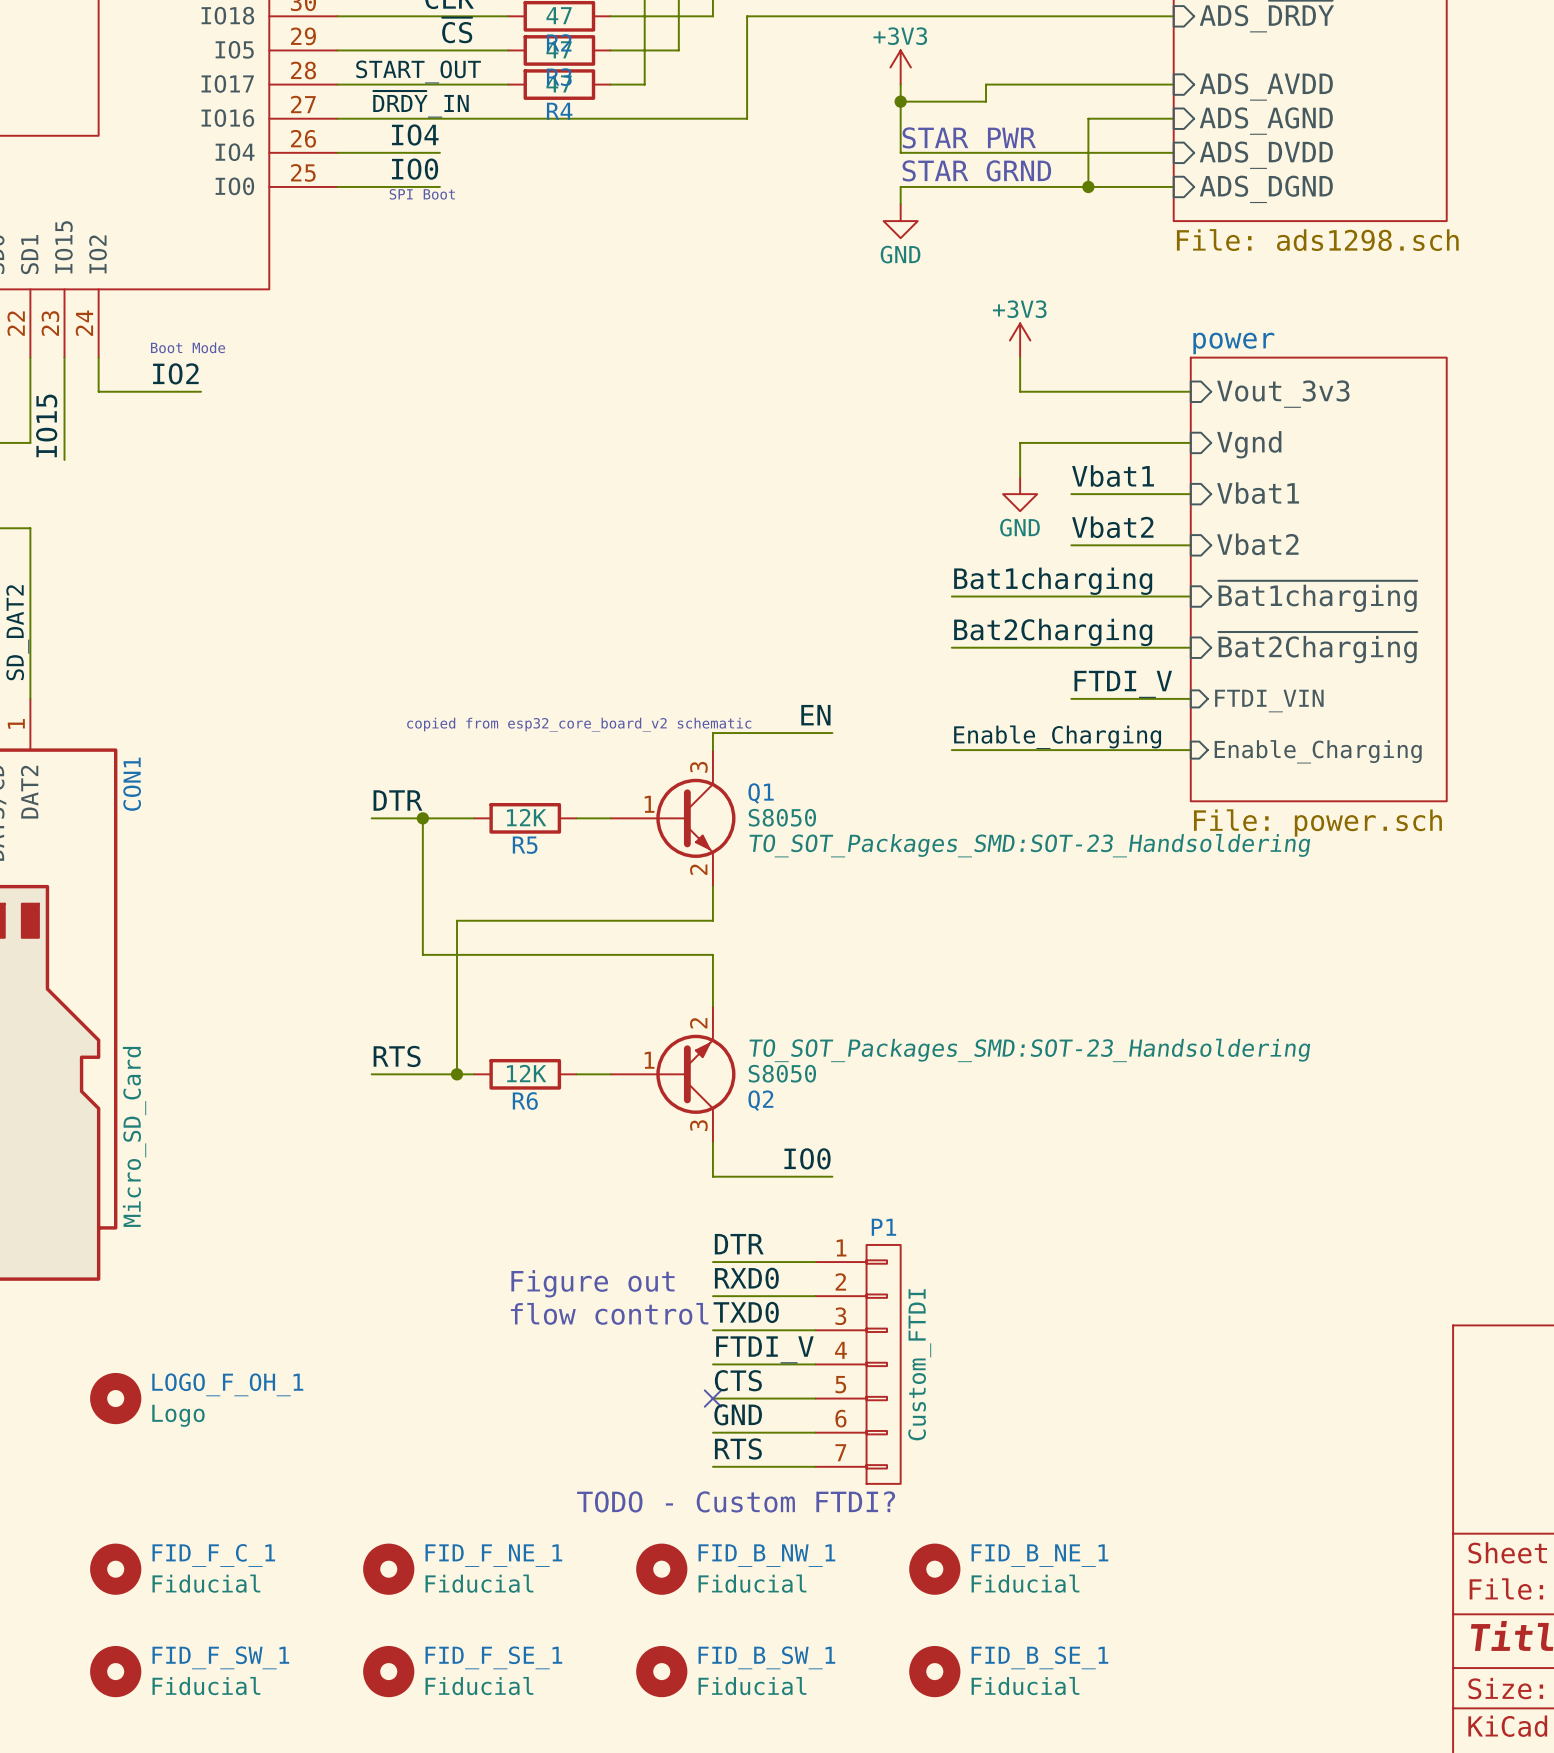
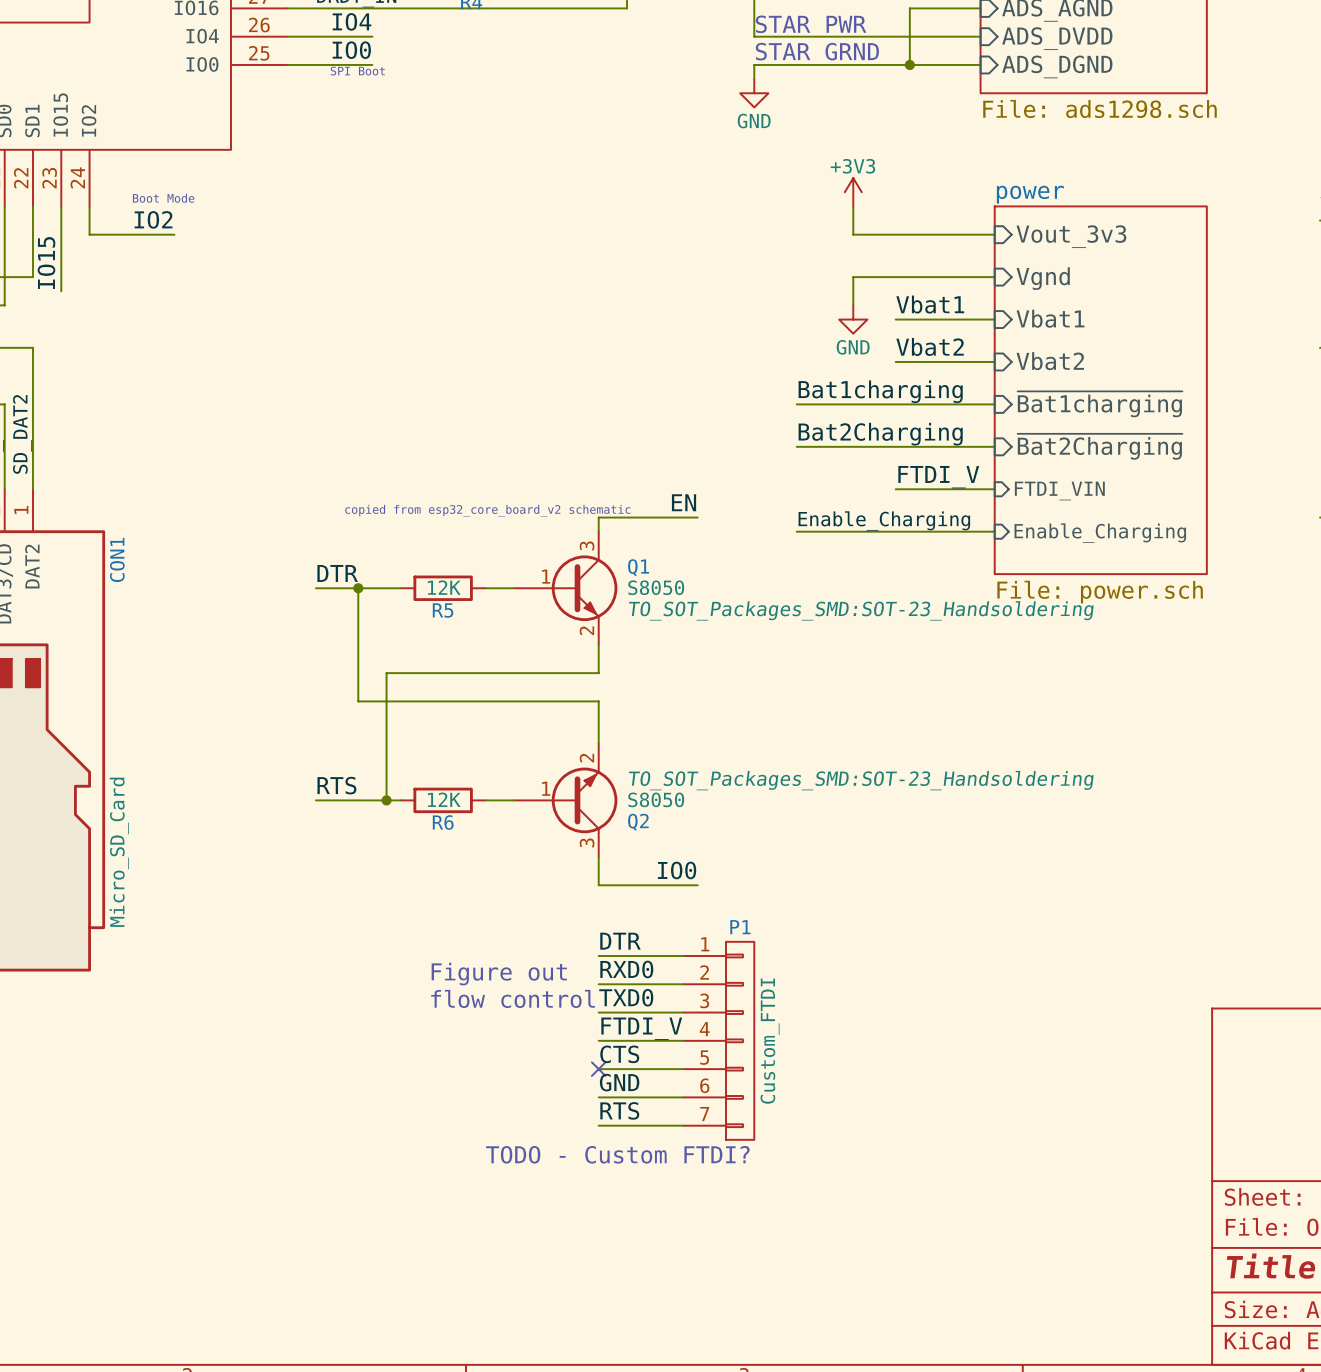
LOGO_F_OH_1: Logo (115, 1398) -> none
FID_F_C_1: Fiducial (115, 1569) -> none
FID_F_NE_1: Fiducial (388, 1569) -> none
FID_B_NW_1: Fiducial (661, 1569) -> none
FID_B_NE_1: Fiducial (934, 1569) -> none
FID_F_SW_1: Fiducial (115, 1671) -> none
FID_F_SE_1: Fiducial (388, 1671) -> none
FID_B_SW_1: Fiducial (661, 1671) -> none
FID_B_SE_1: Fiducial (934, 1671) -> none

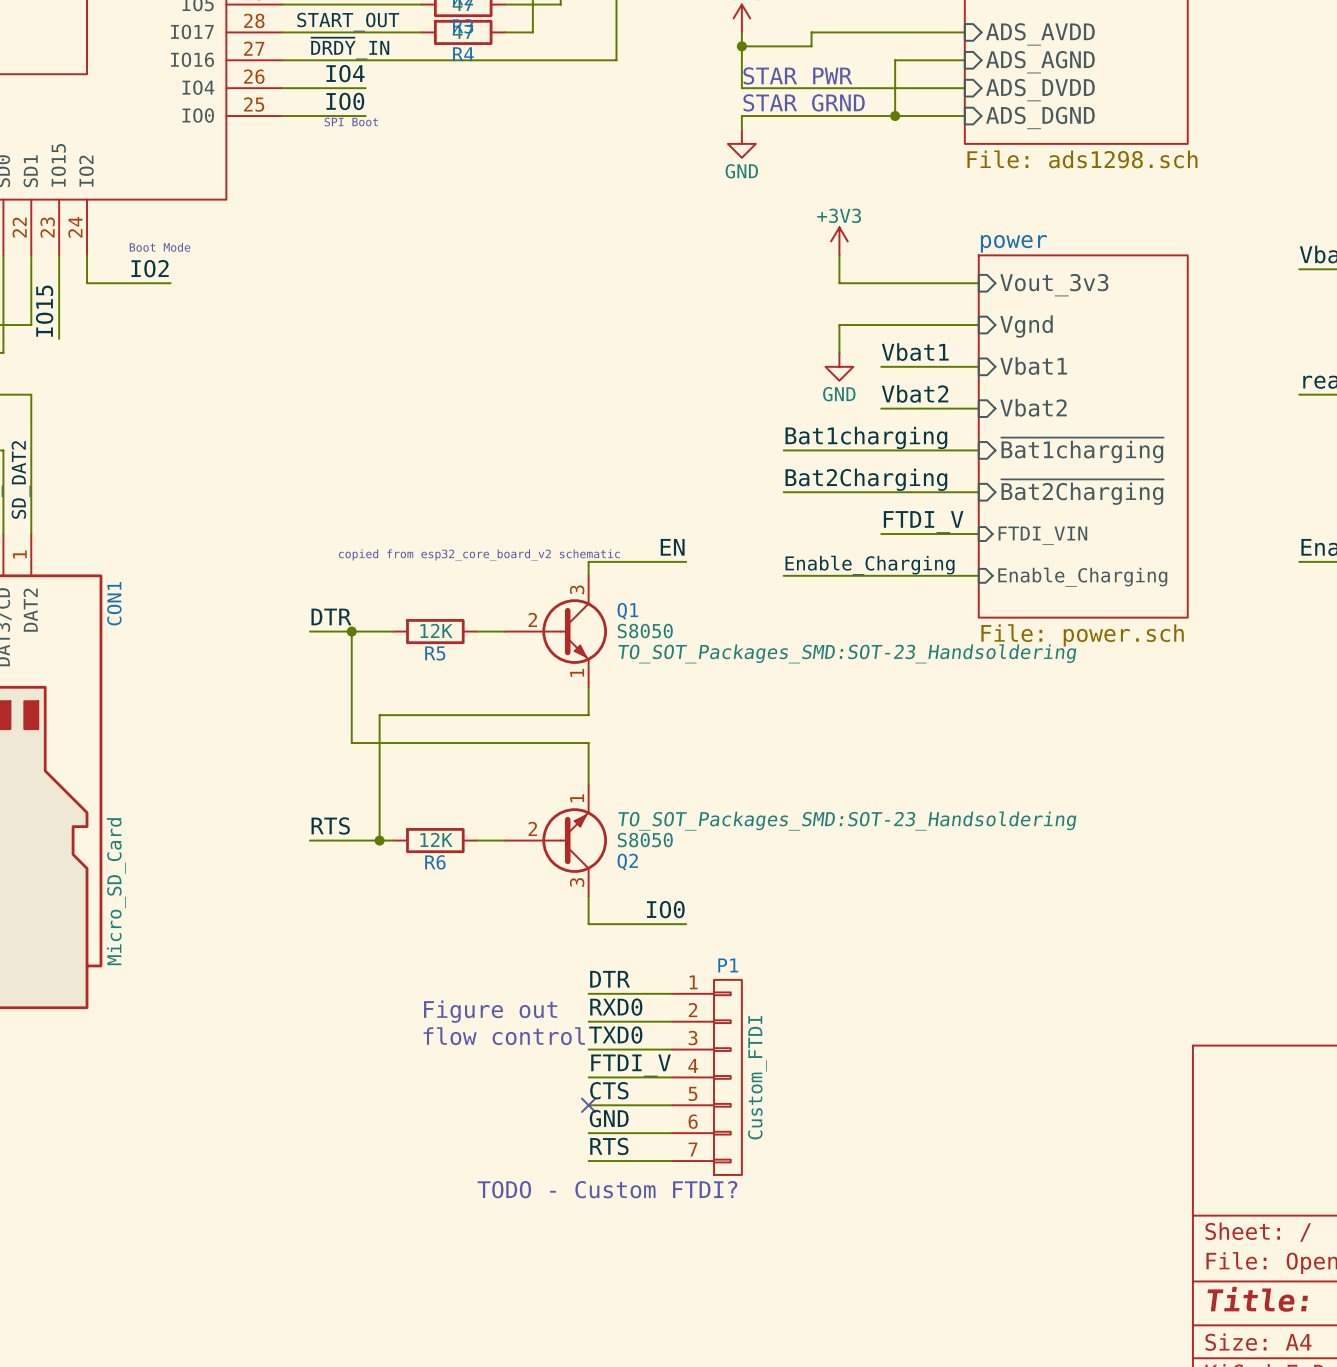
Q1 symbol: [513, 531, 618, 645] -> [505, 575, 608, 688]
Q2 symbol: [513, 743, 618, 857] -> [505, 784, 608, 897]

